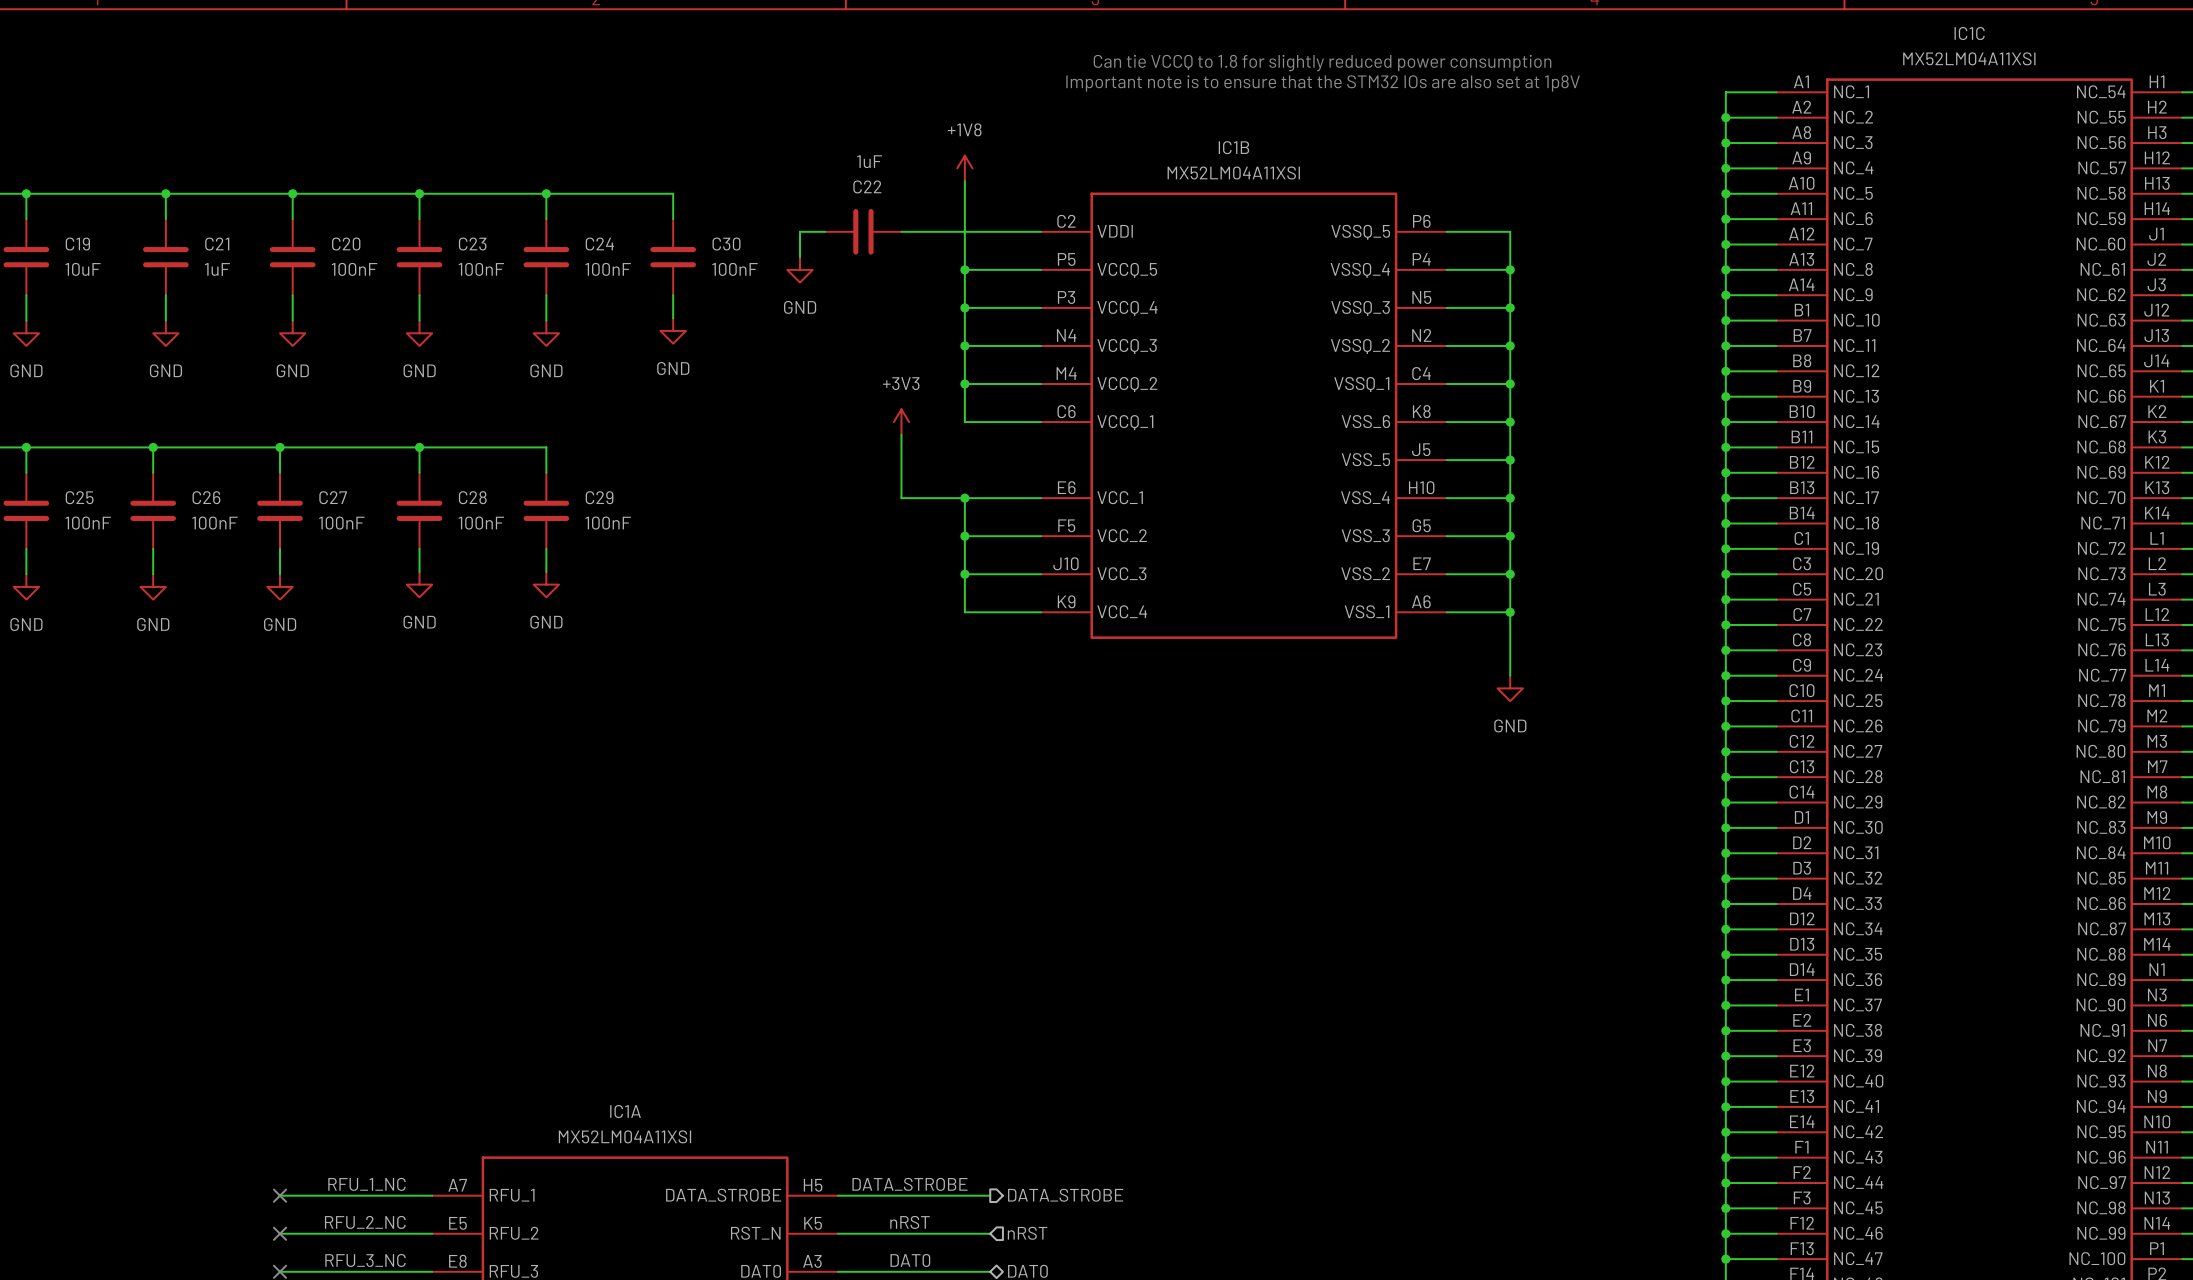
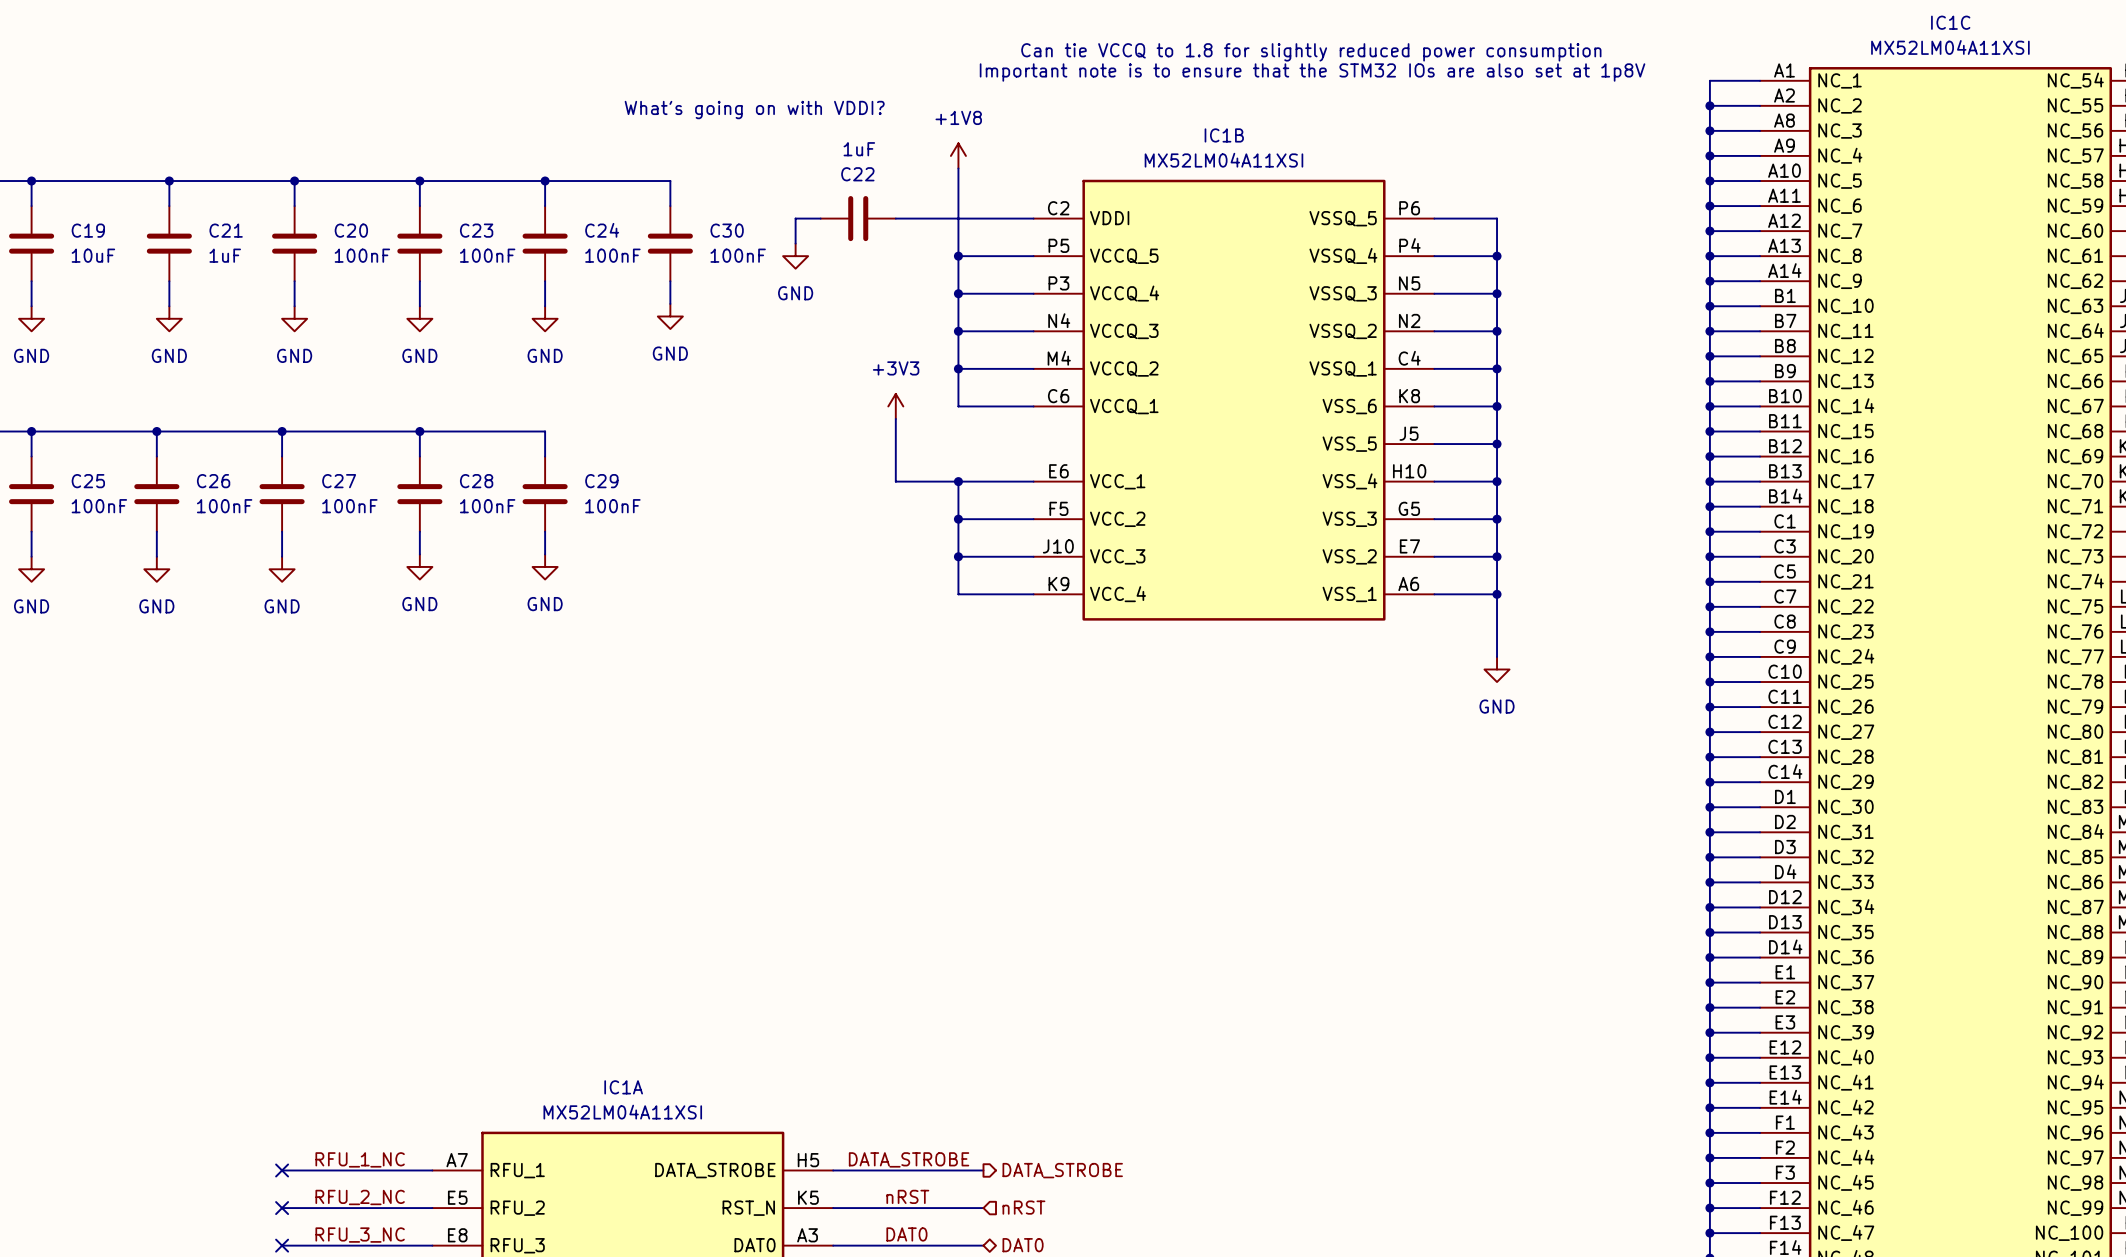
text: none -> What's going on with VDDI? (754, 110)

